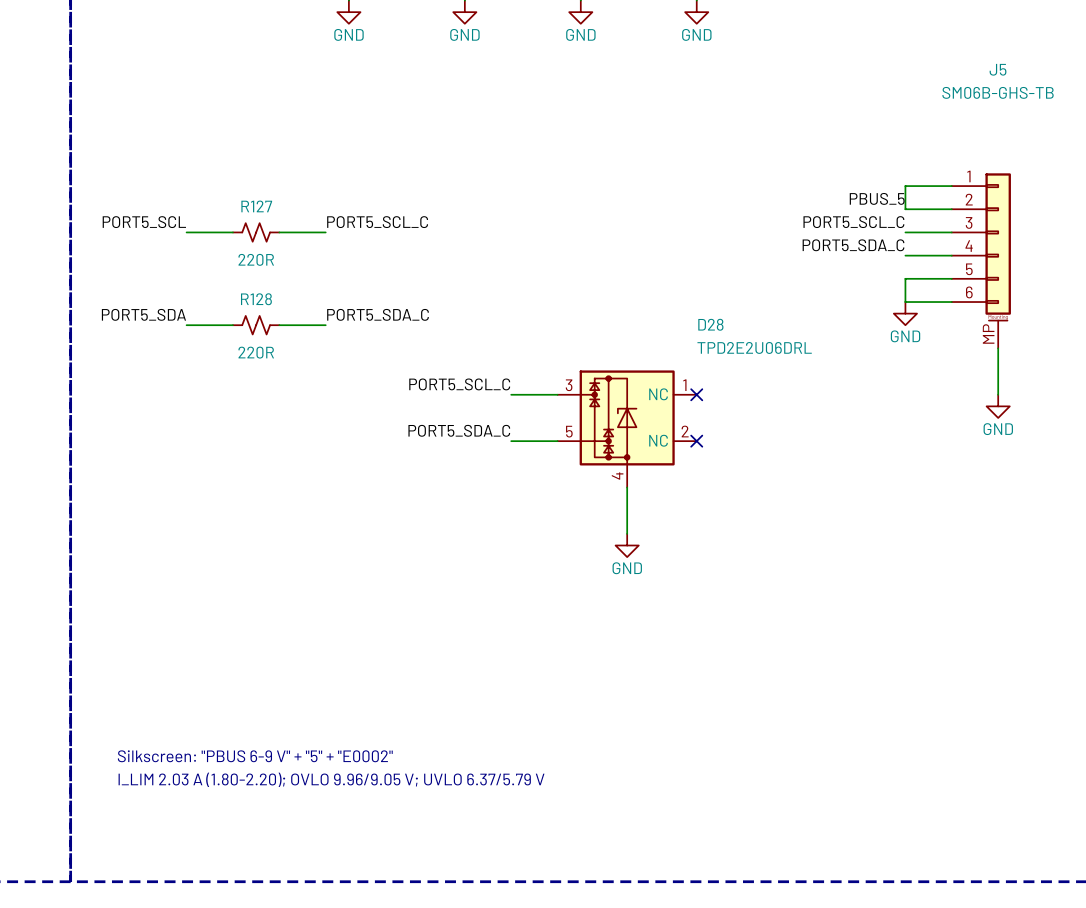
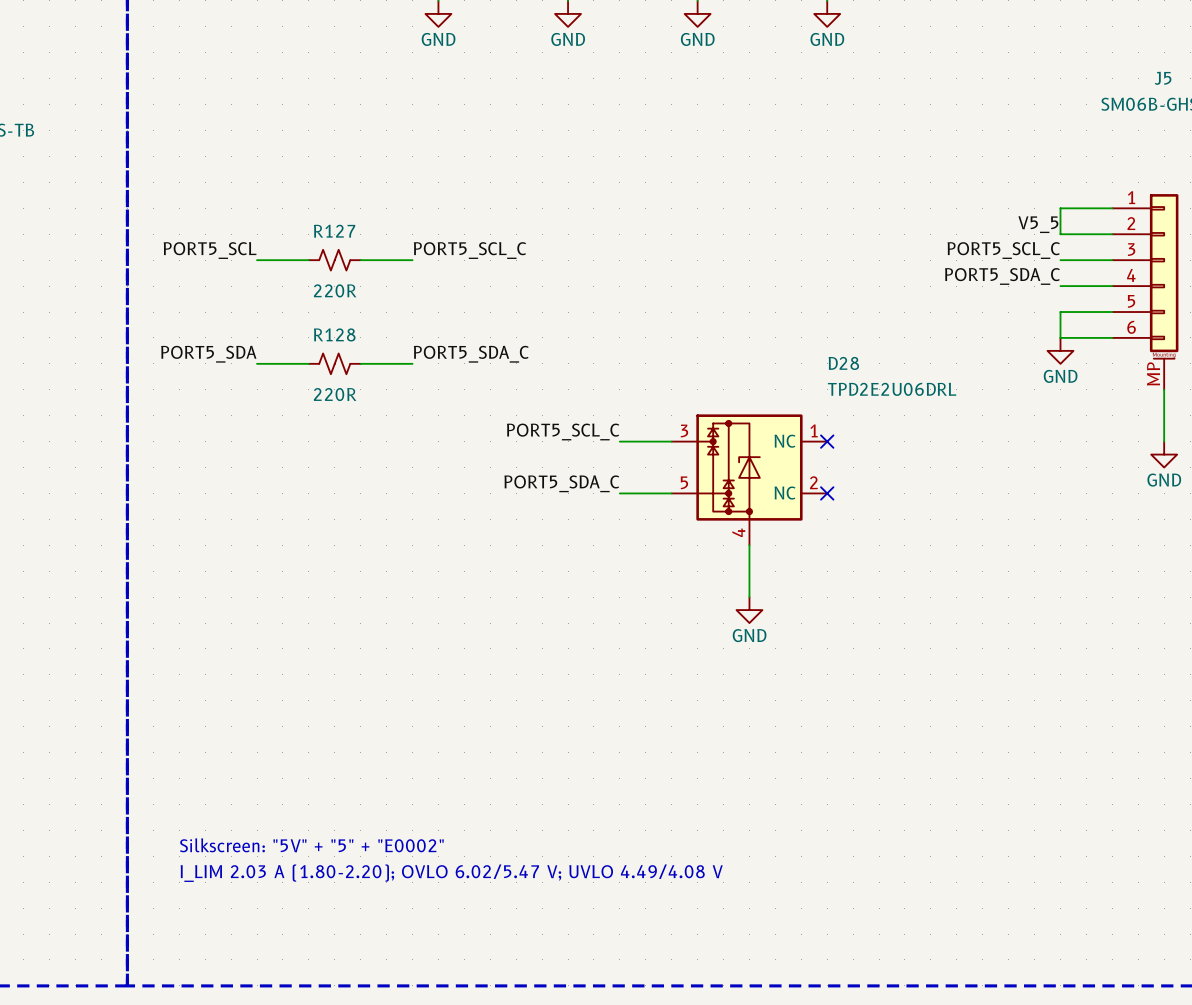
label: PBUS_5 (877, 198) -> V5_5 (1038, 224)
text: Silkscreen: "PBUS 6-9 V" + "5" + "E0002" (255, 756) -> Silkscreen: "5V" + "5" + "E0002" (311, 845)
text: I_LIM 2.03 A (1.80-2.20); OVLO 9.96/9.05 V; UVLO 6.37/5.79 V (331, 779) -> I_LIM 2.03 A (1.80-2.20); OVLO 6.02/5.47 V; UVLO 4.49/4.08 V (451, 873)

